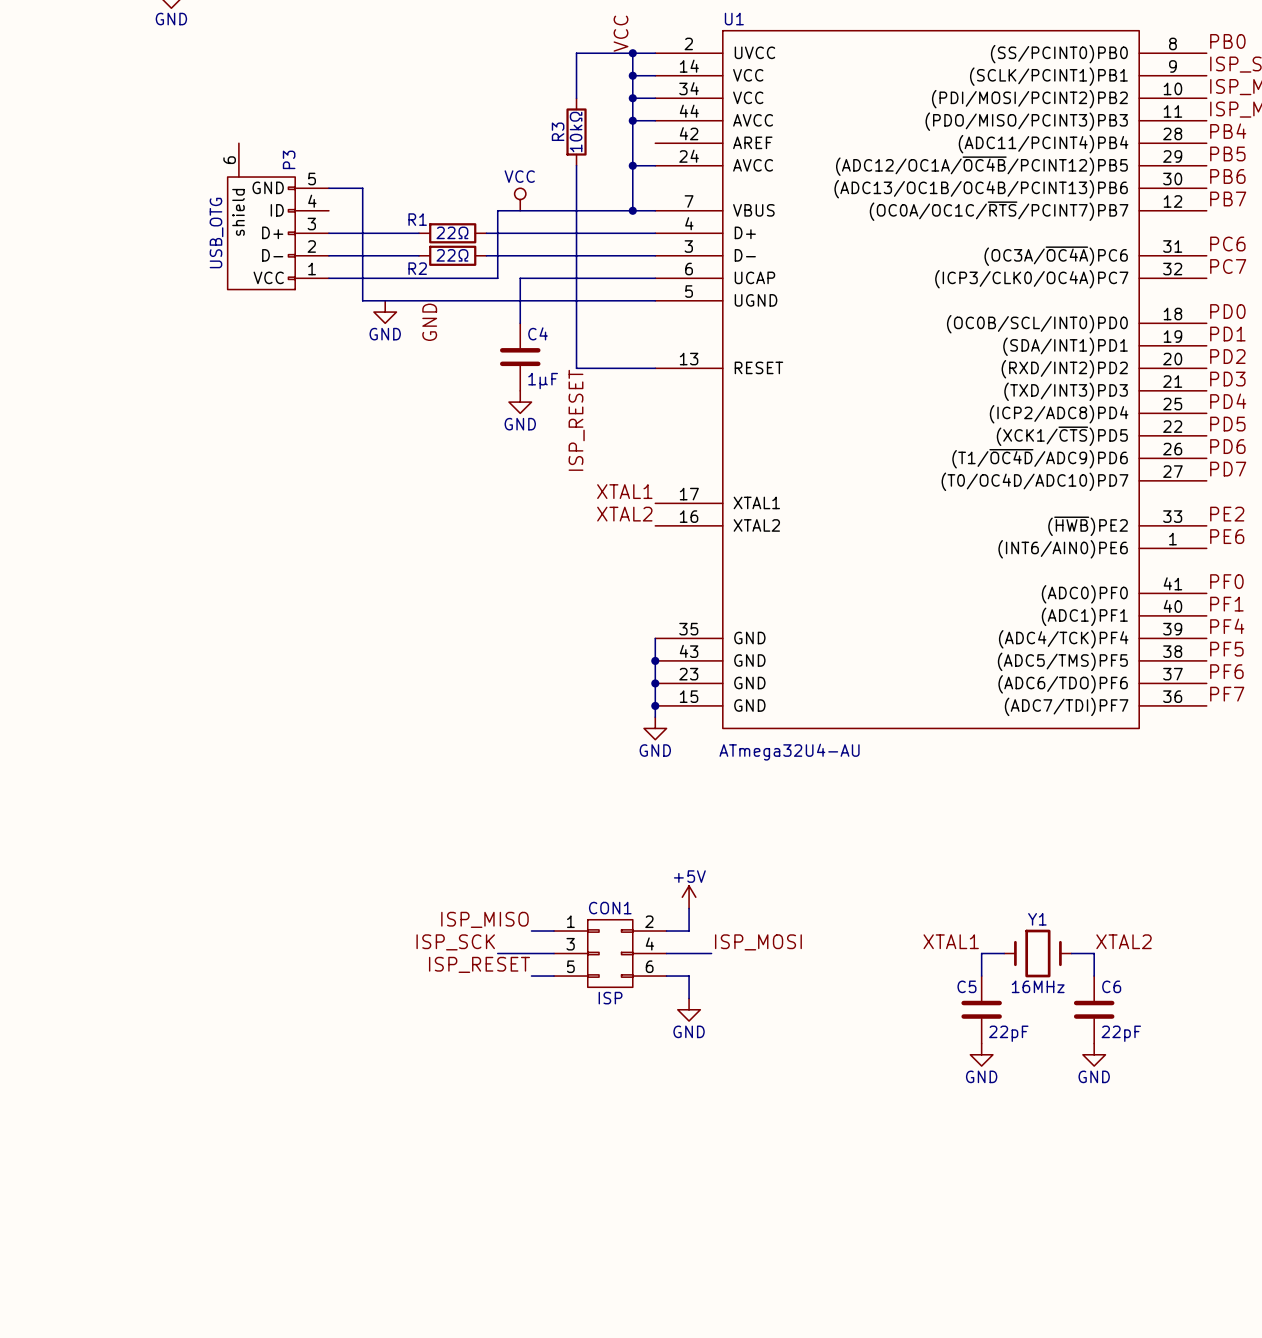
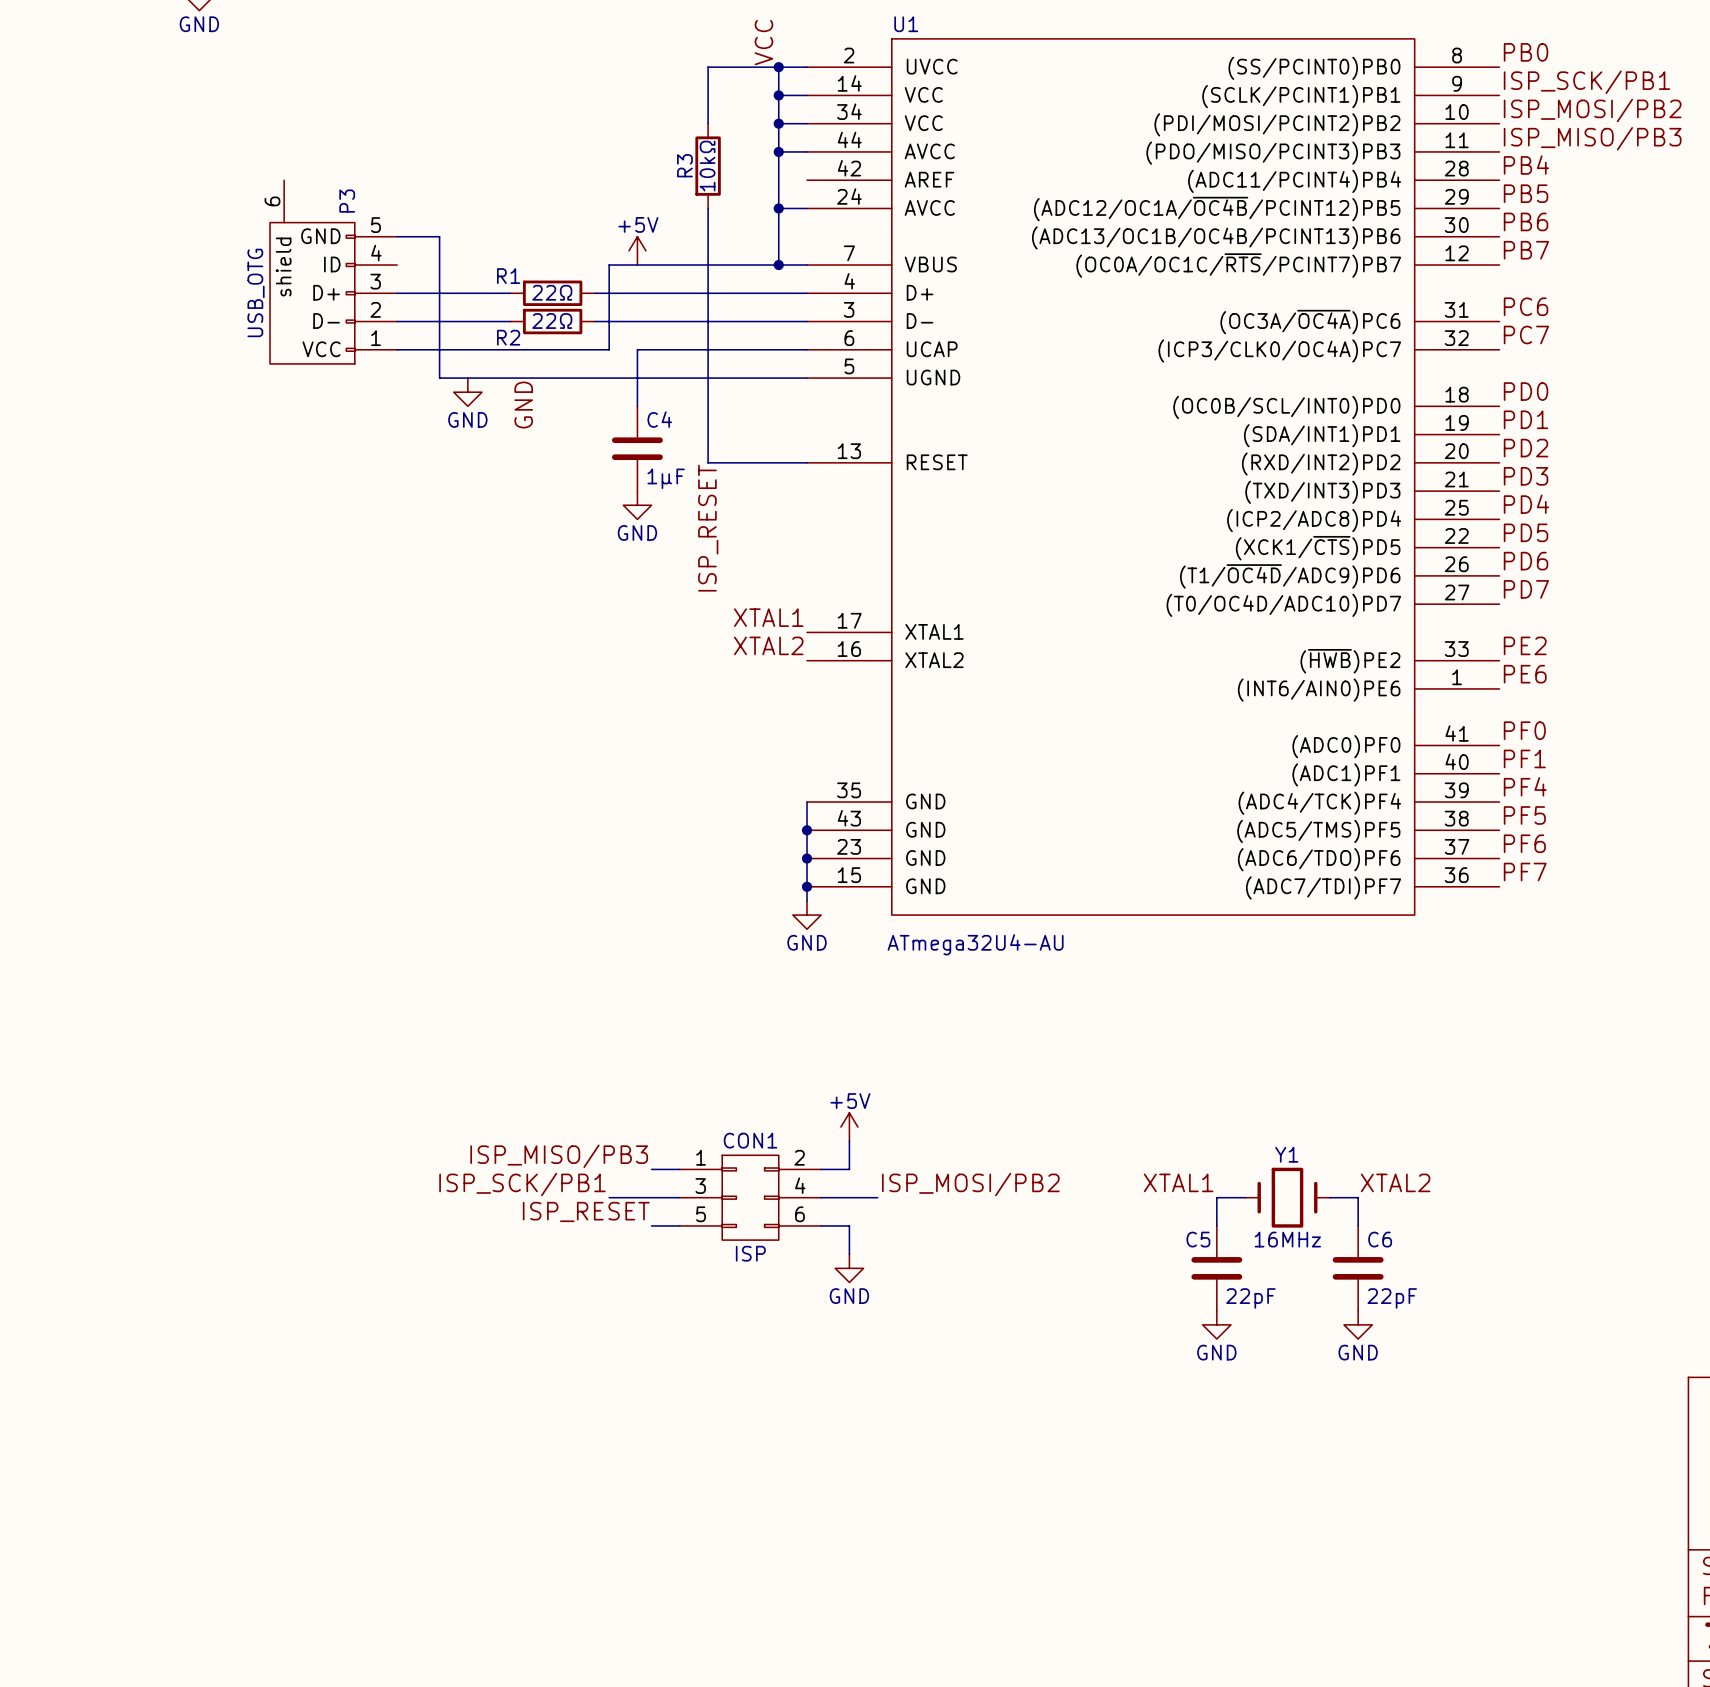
power symbol: VCC (520, 199) -> +5V (637, 250)
label: ISP_MISO (484, 919) -> ISP_MISO/PB3 (559, 1156)
label: ISP_SCK (455, 942) -> ISP_SCK/PB1 (522, 1184)
label: ISP_MOSI (758, 942) -> ISP_MOSI/PB2 (970, 1184)

